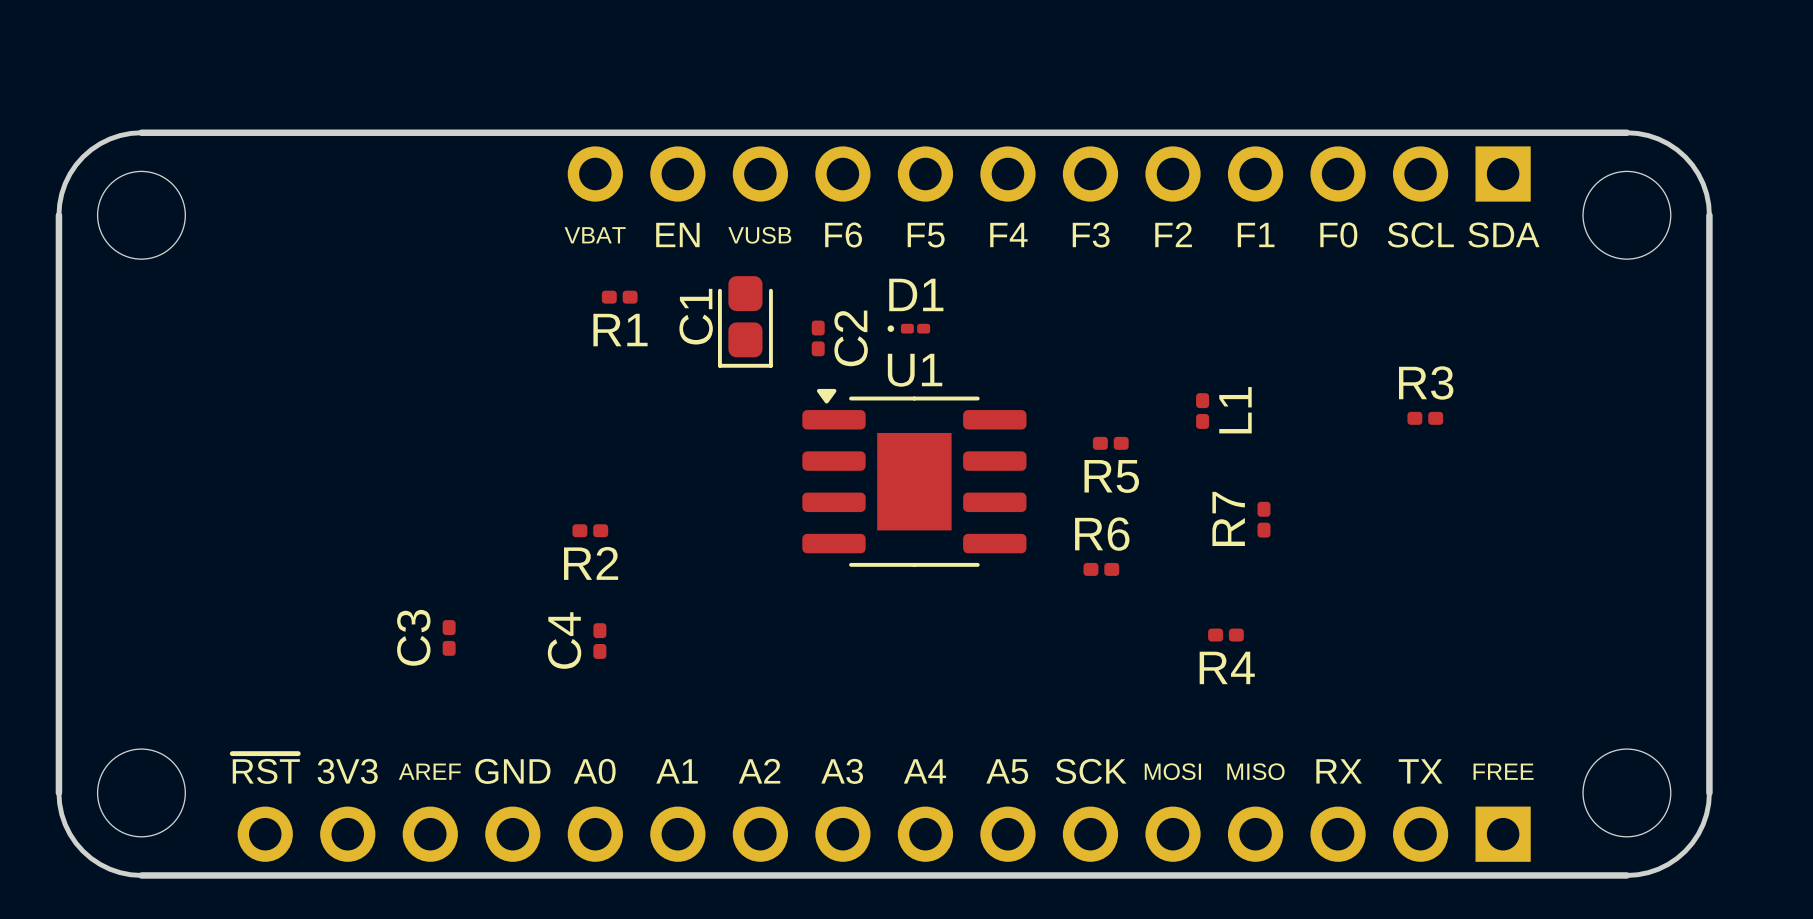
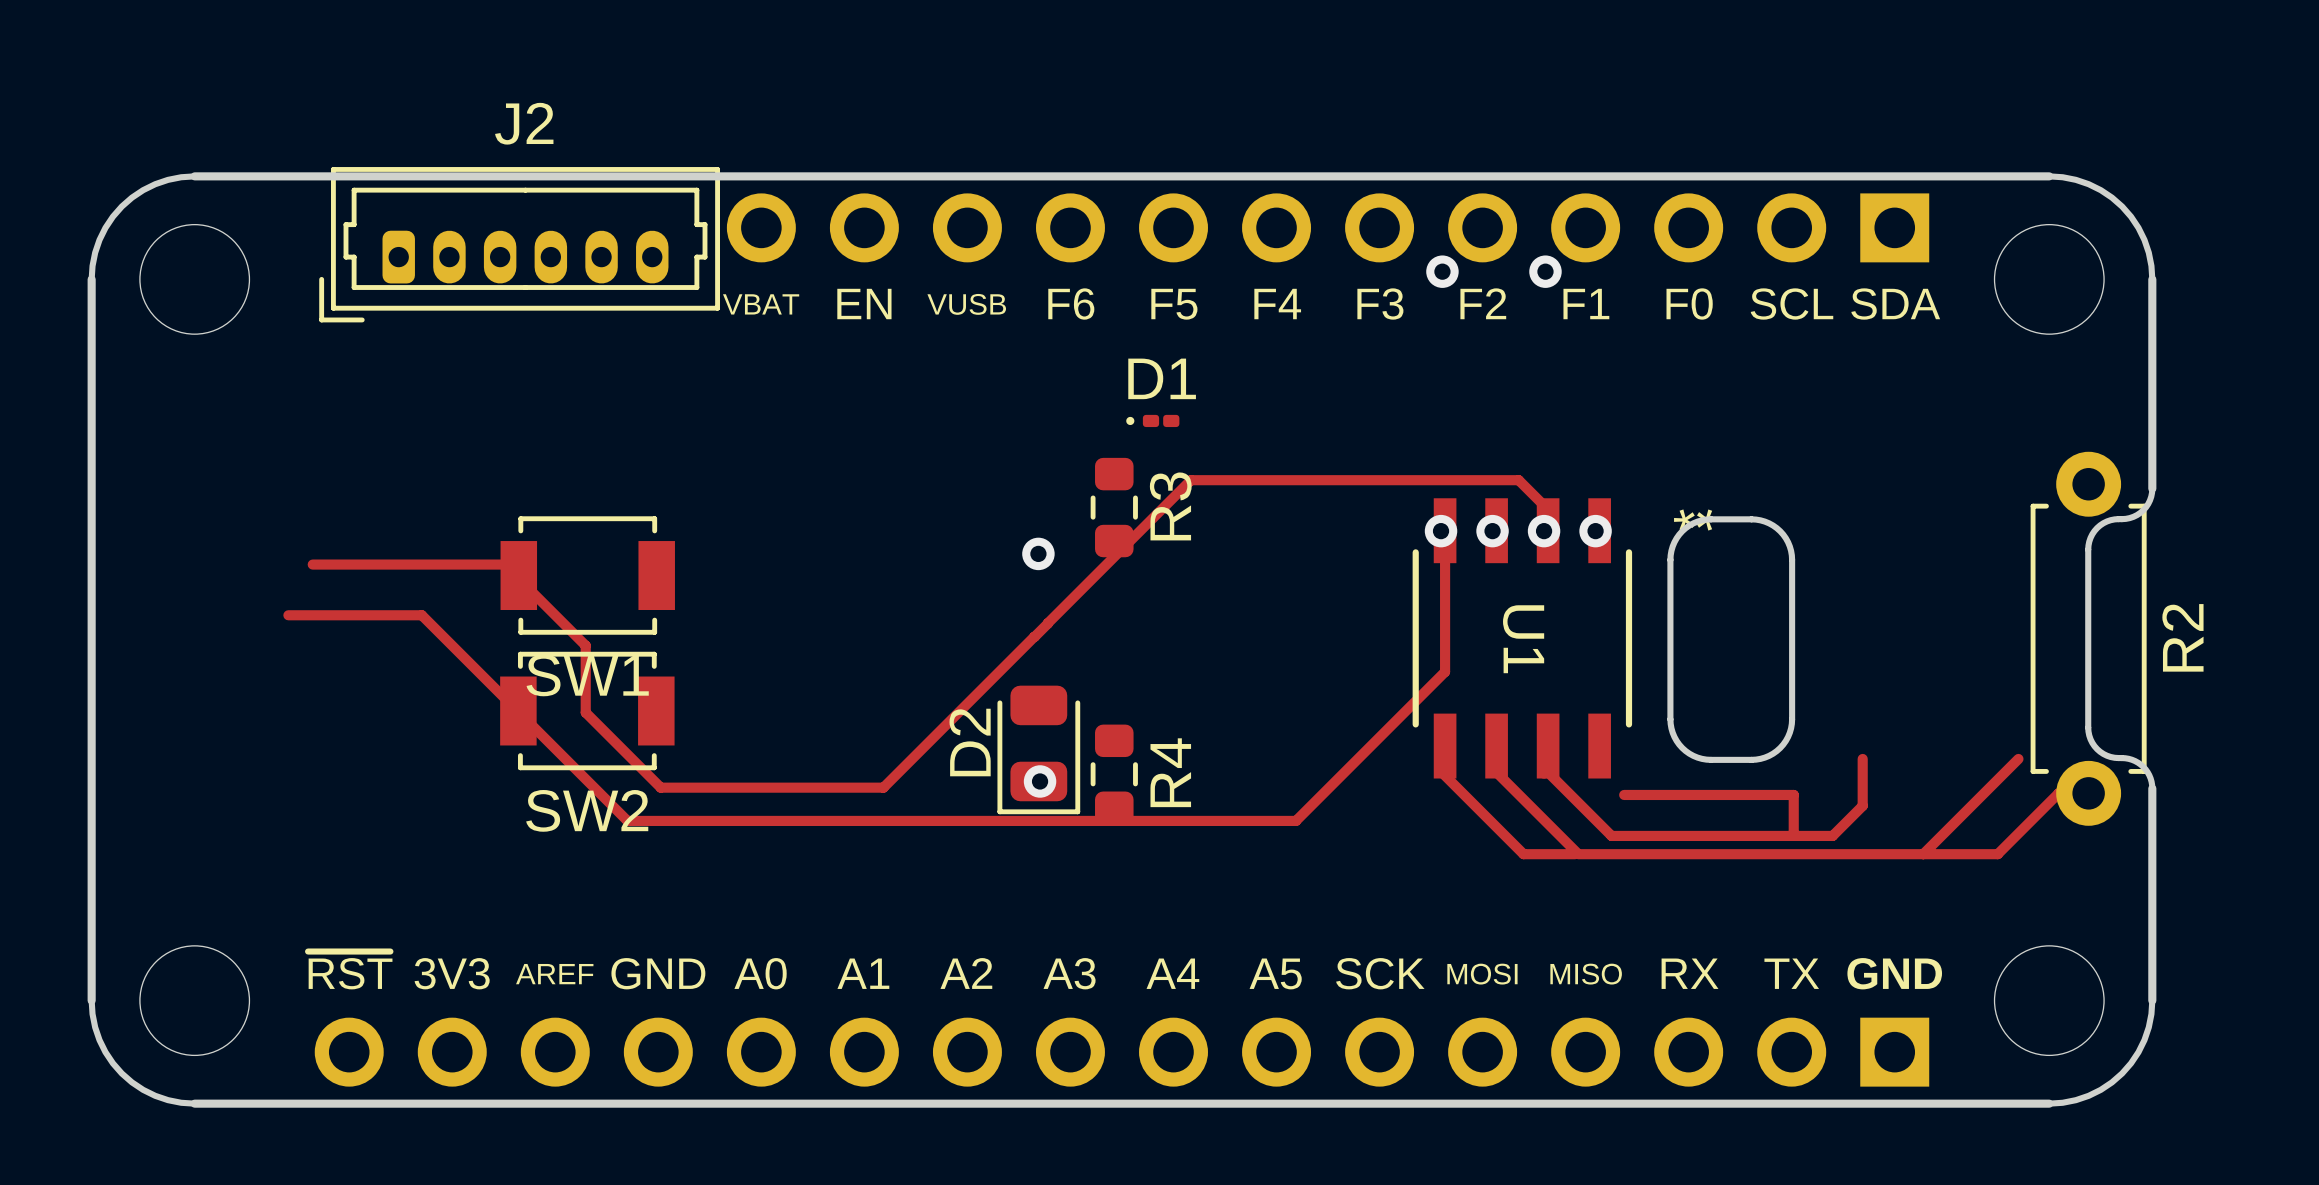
J2: none -> (519, 244)
via: none -> (1442, 271)
via: none -> (1545, 271)
R1: (619, 297) -> none
C1: (745, 321) -> none
C2: (818, 338) -> none
U1 name position: U1 (915, 370) -> U1 (1523, 639)
board edge: (1709, 382) (1709, 623) -> (2152, 488) (2150, 500) (2143, 510) (2133, 516) (2110, 520) (2100, 525) (2092, 534) (2088, 549) (2089, 735) (2094, 746) (2103, 753) (2114, 757) (2128, 758) (2140, 764) (2149, 775) (2152, 788)
U1 footprint: [802, 388, 1027, 567] -> [1412, 498, 1633, 779]
board edge: none -> (1710, 519) (1751, 519) (1764, 521) (1780, 531) (1788, 542) (1791, 550) (1791, 723) (1789, 732) (1783, 744) (1773, 753) (1760, 758) (1710, 759) (1697, 757) (1685, 751) (1679, 744) (1671, 728) (1671, 550) (1676, 538) (1685, 528) (1697, 521) (1710, 519)
L1: (1202, 411) -> none
R3 footprint: [1407, 411, 1444, 425] -> [1090, 457, 1138, 558]
via: none -> (1441, 531)
track: none -> (1445, 530) (1445, 671) (1296, 820) (627, 820) (421, 615) (288, 615)
via: none -> (1492, 531)
via: none -> (1544, 531)
track: none -> (1548, 530) (1548, 509) (1518, 480) (1190, 480) (1047, 623)
via: none -> (1595, 531)
via: none -> (1038, 553)
track: none -> (312, 564) (504, 564) (585, 645) (585, 712) (660, 787) (883, 787) (1034, 636)
R5: (1110, 443) -> none
SW1: none -> (587, 575)
track: none -> (1047, 623) (1034, 636)
R7: (1263, 519) -> none
R2 footprint: [572, 524, 609, 538] -> [2030, 451, 2147, 826]
SW2: none -> (587, 711)
R2 name position: R2 (591, 563) -> R2 (2182, 637)
R6: (1101, 569) -> none
track: none -> (1441, 746) (1441, 771) (1523, 854) (1575, 854)
track: none -> (1492, 746) (1492, 768) (1576, 852)
track: none -> (1548, 746) (1548, 772) (1611, 835) (1832, 835) (1862, 805) (1862, 758)
D2: none -> (1038, 749)
track: none -> (2018, 758) (1923, 854)
via: none -> (1040, 781)
track: none -> (2088, 793) (2058, 793) (1997, 854) (1578, 854)
R4 footprint: [1208, 628, 1244, 642] -> [1090, 724, 1138, 824]
track: none -> (1624, 794) (1793, 794) (1793, 834)
C3: (449, 637) -> none
C4: (599, 641) -> none
text: FREE (1503, 771) -> GND (1894, 973)

